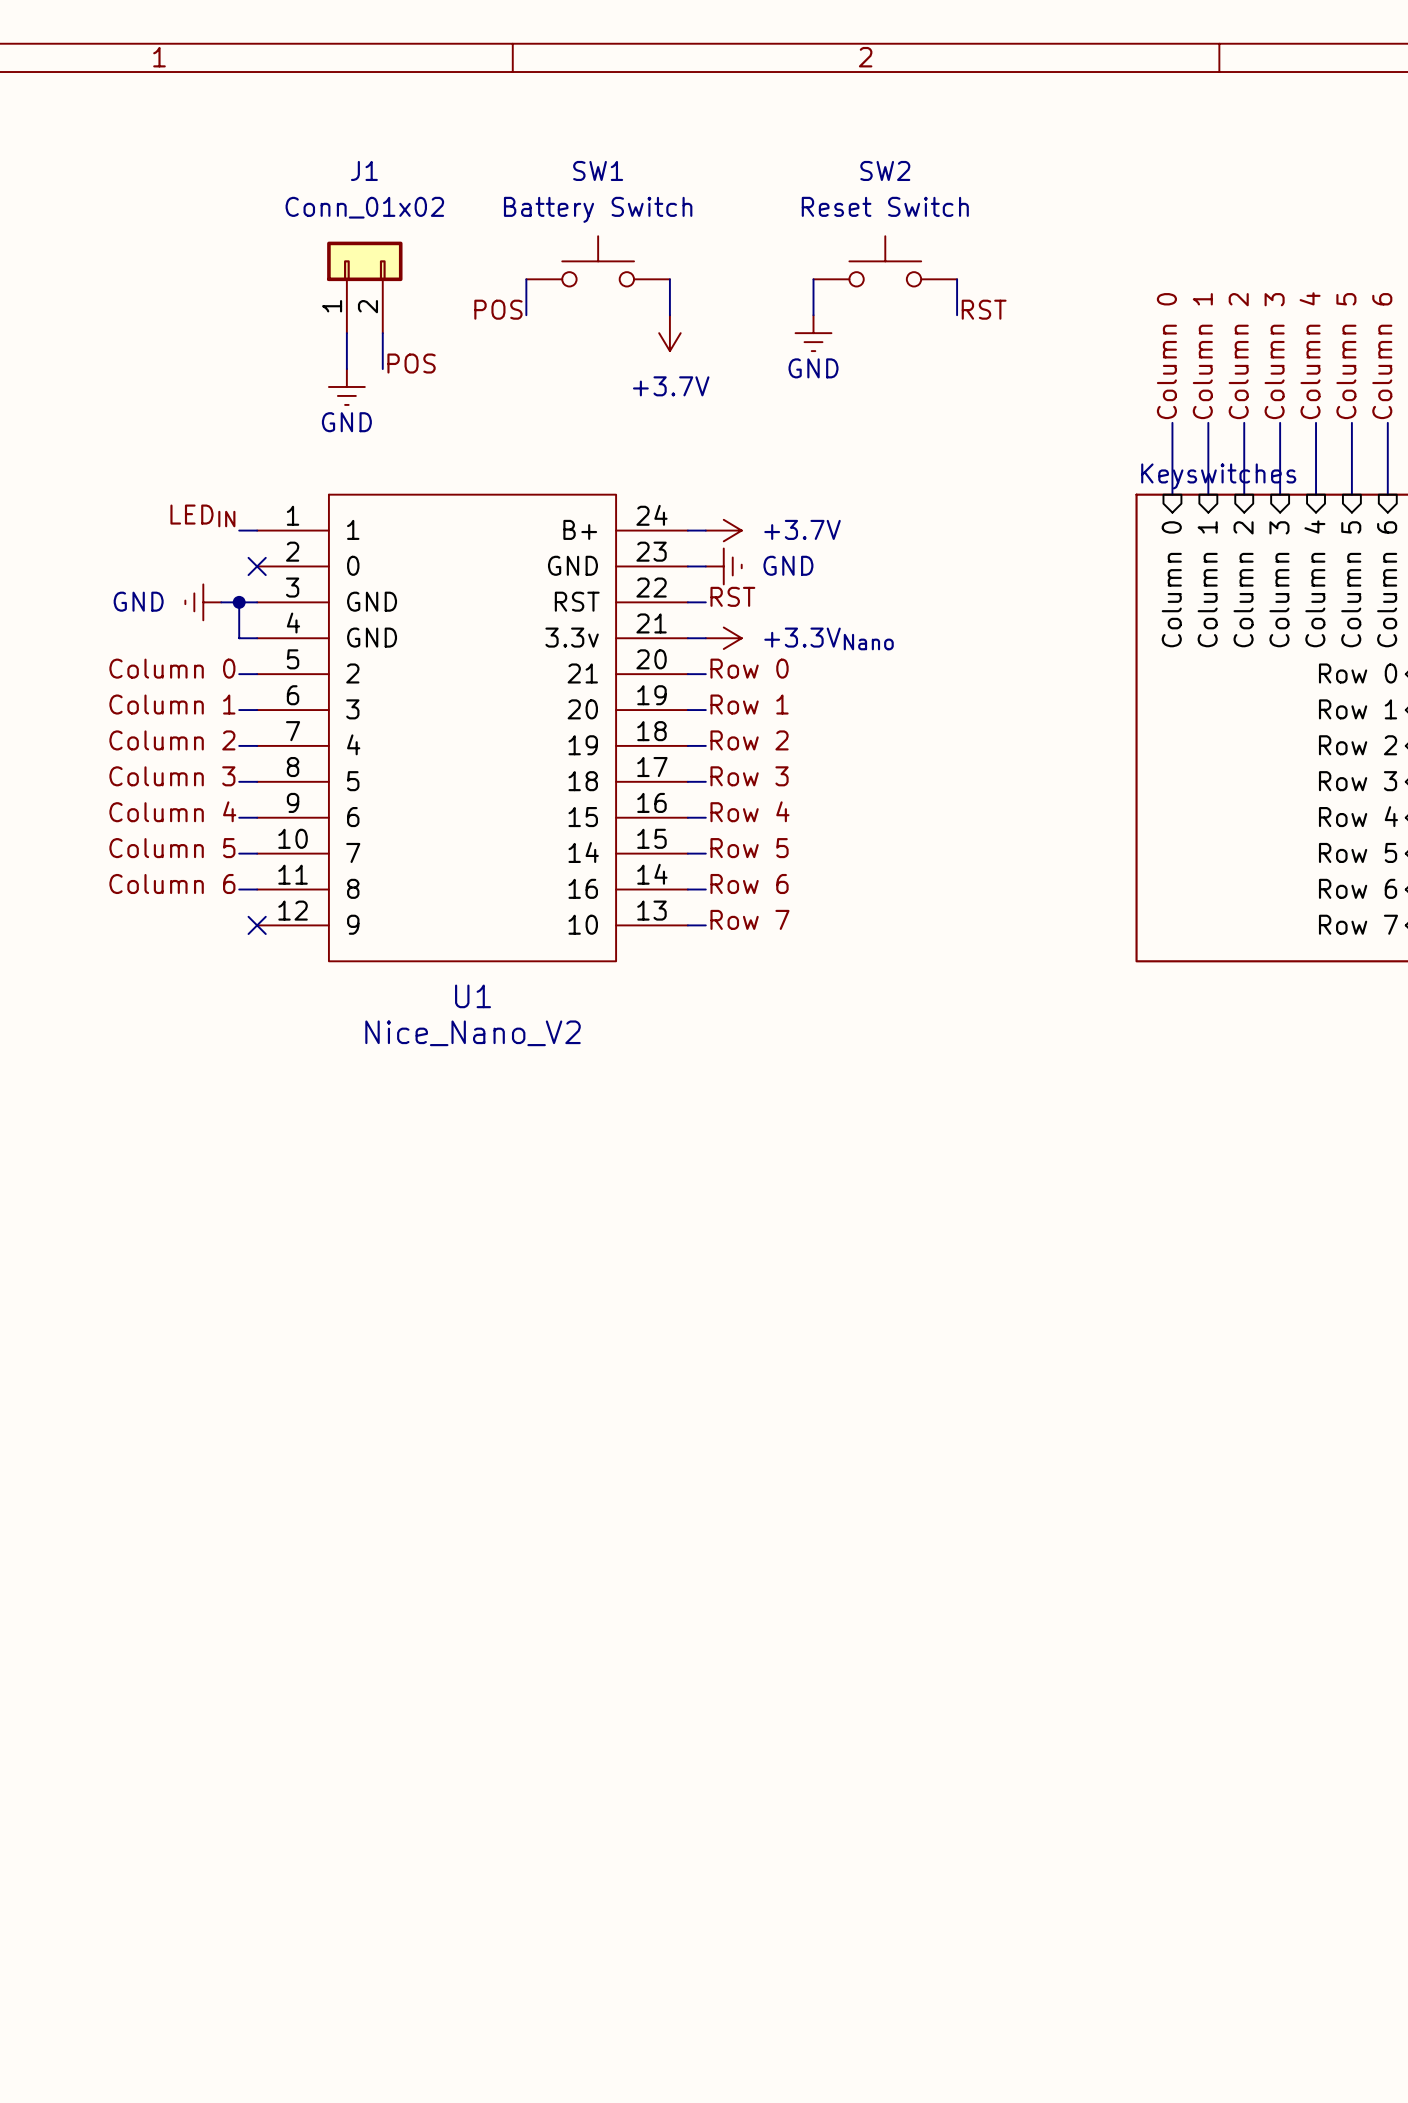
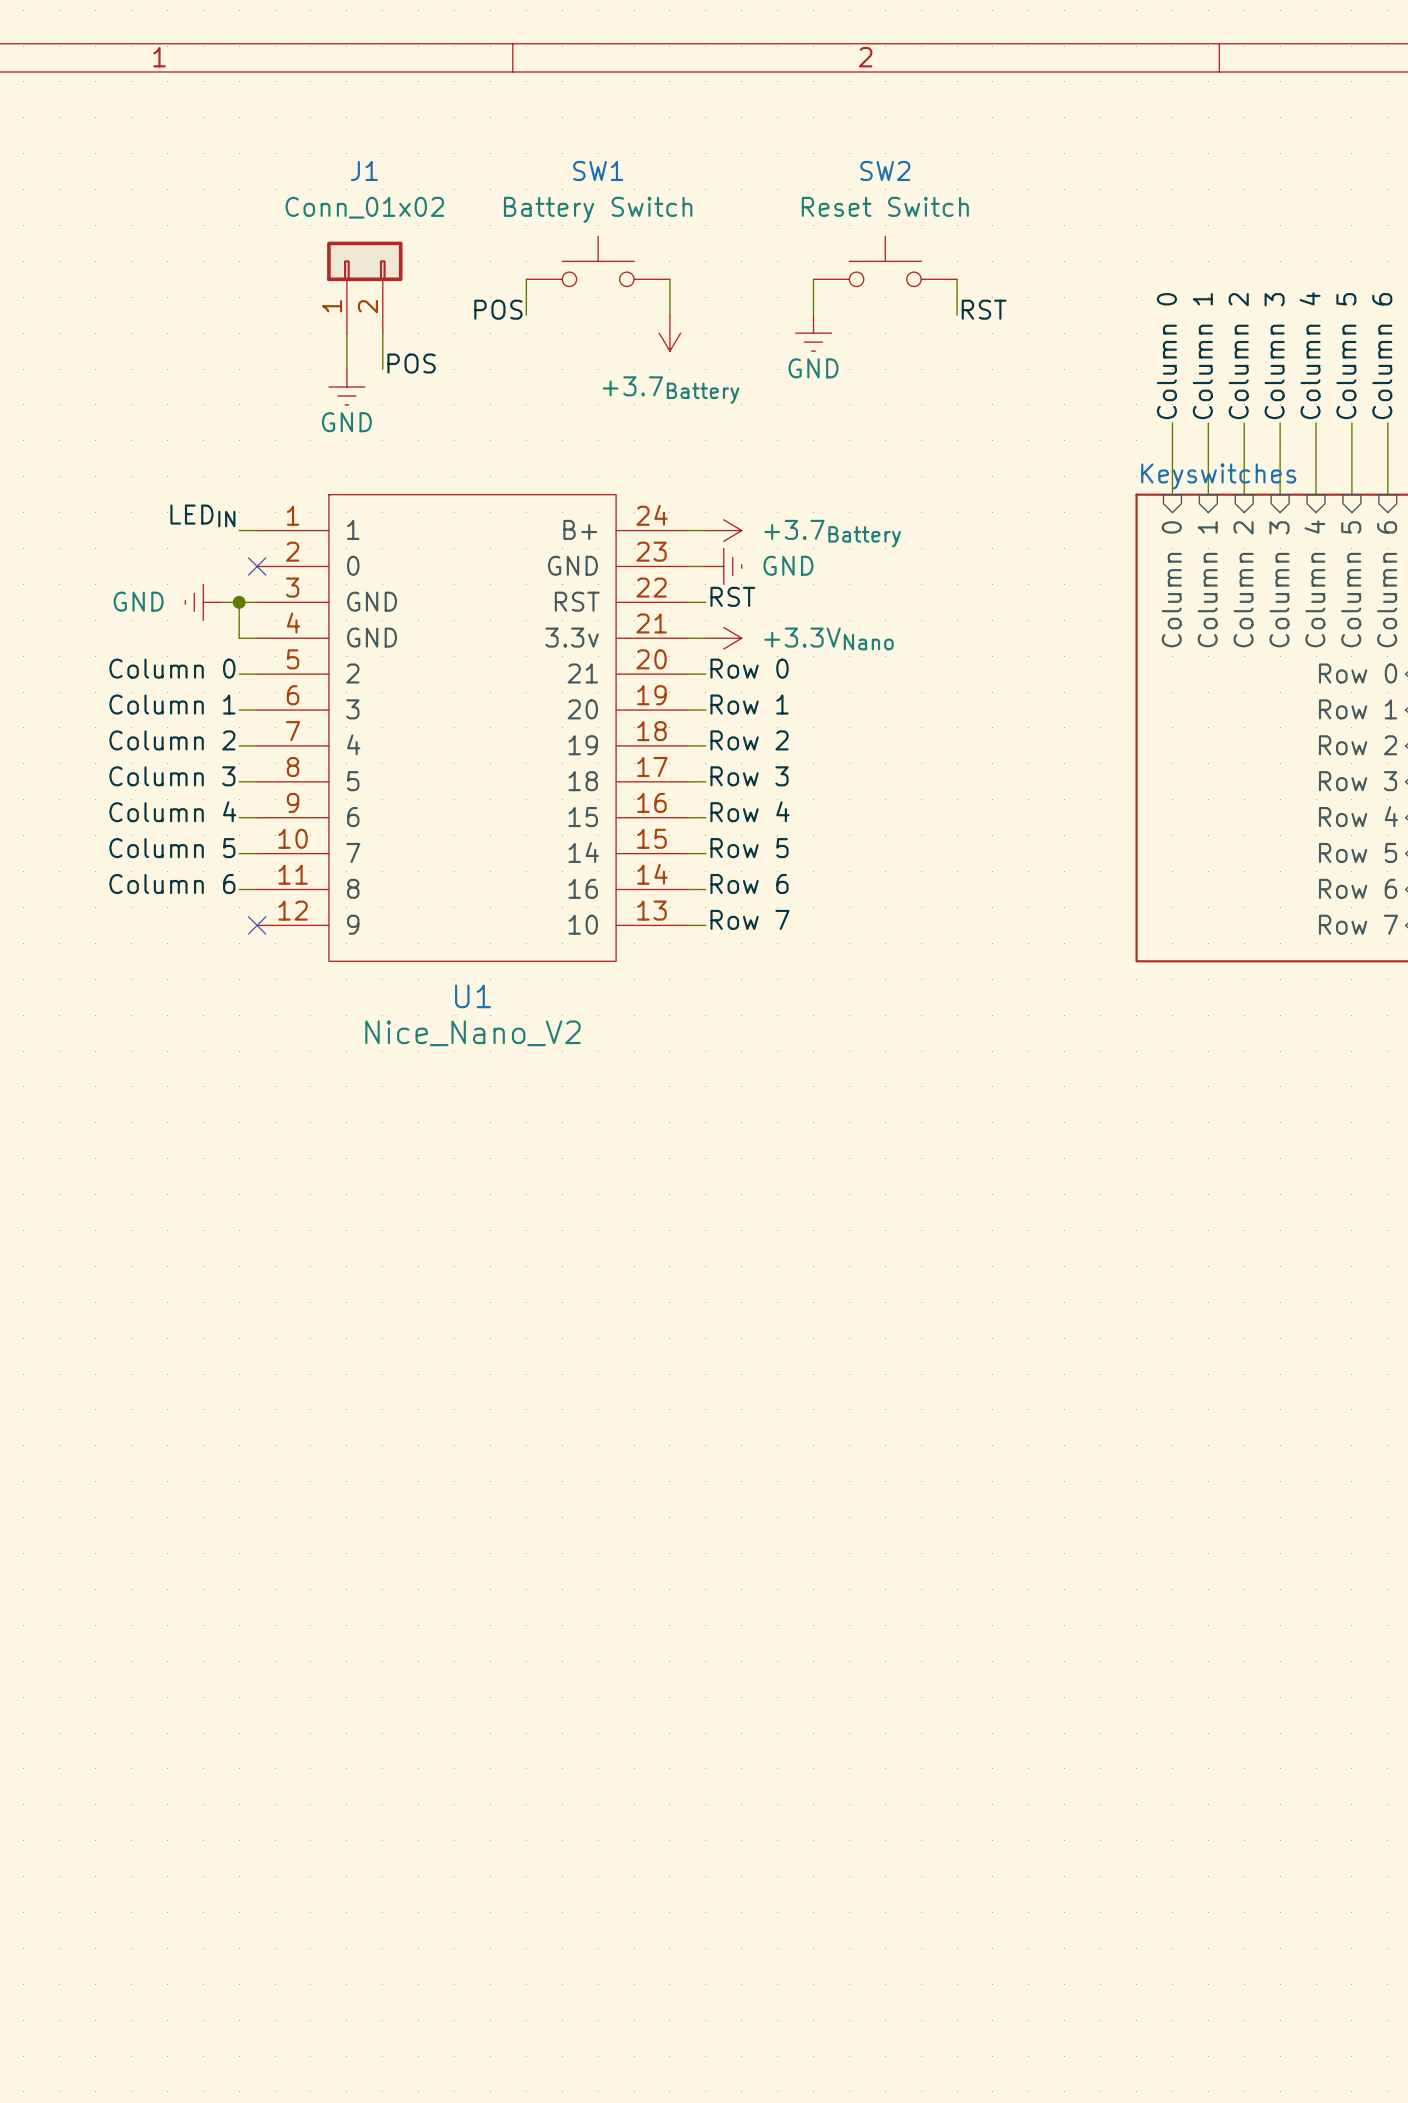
power symbol: +3.7V (669, 333) -> +3.7Battery (669, 333)
power symbol: +3.7V (723, 530) -> +3.7Battery (723, 530)

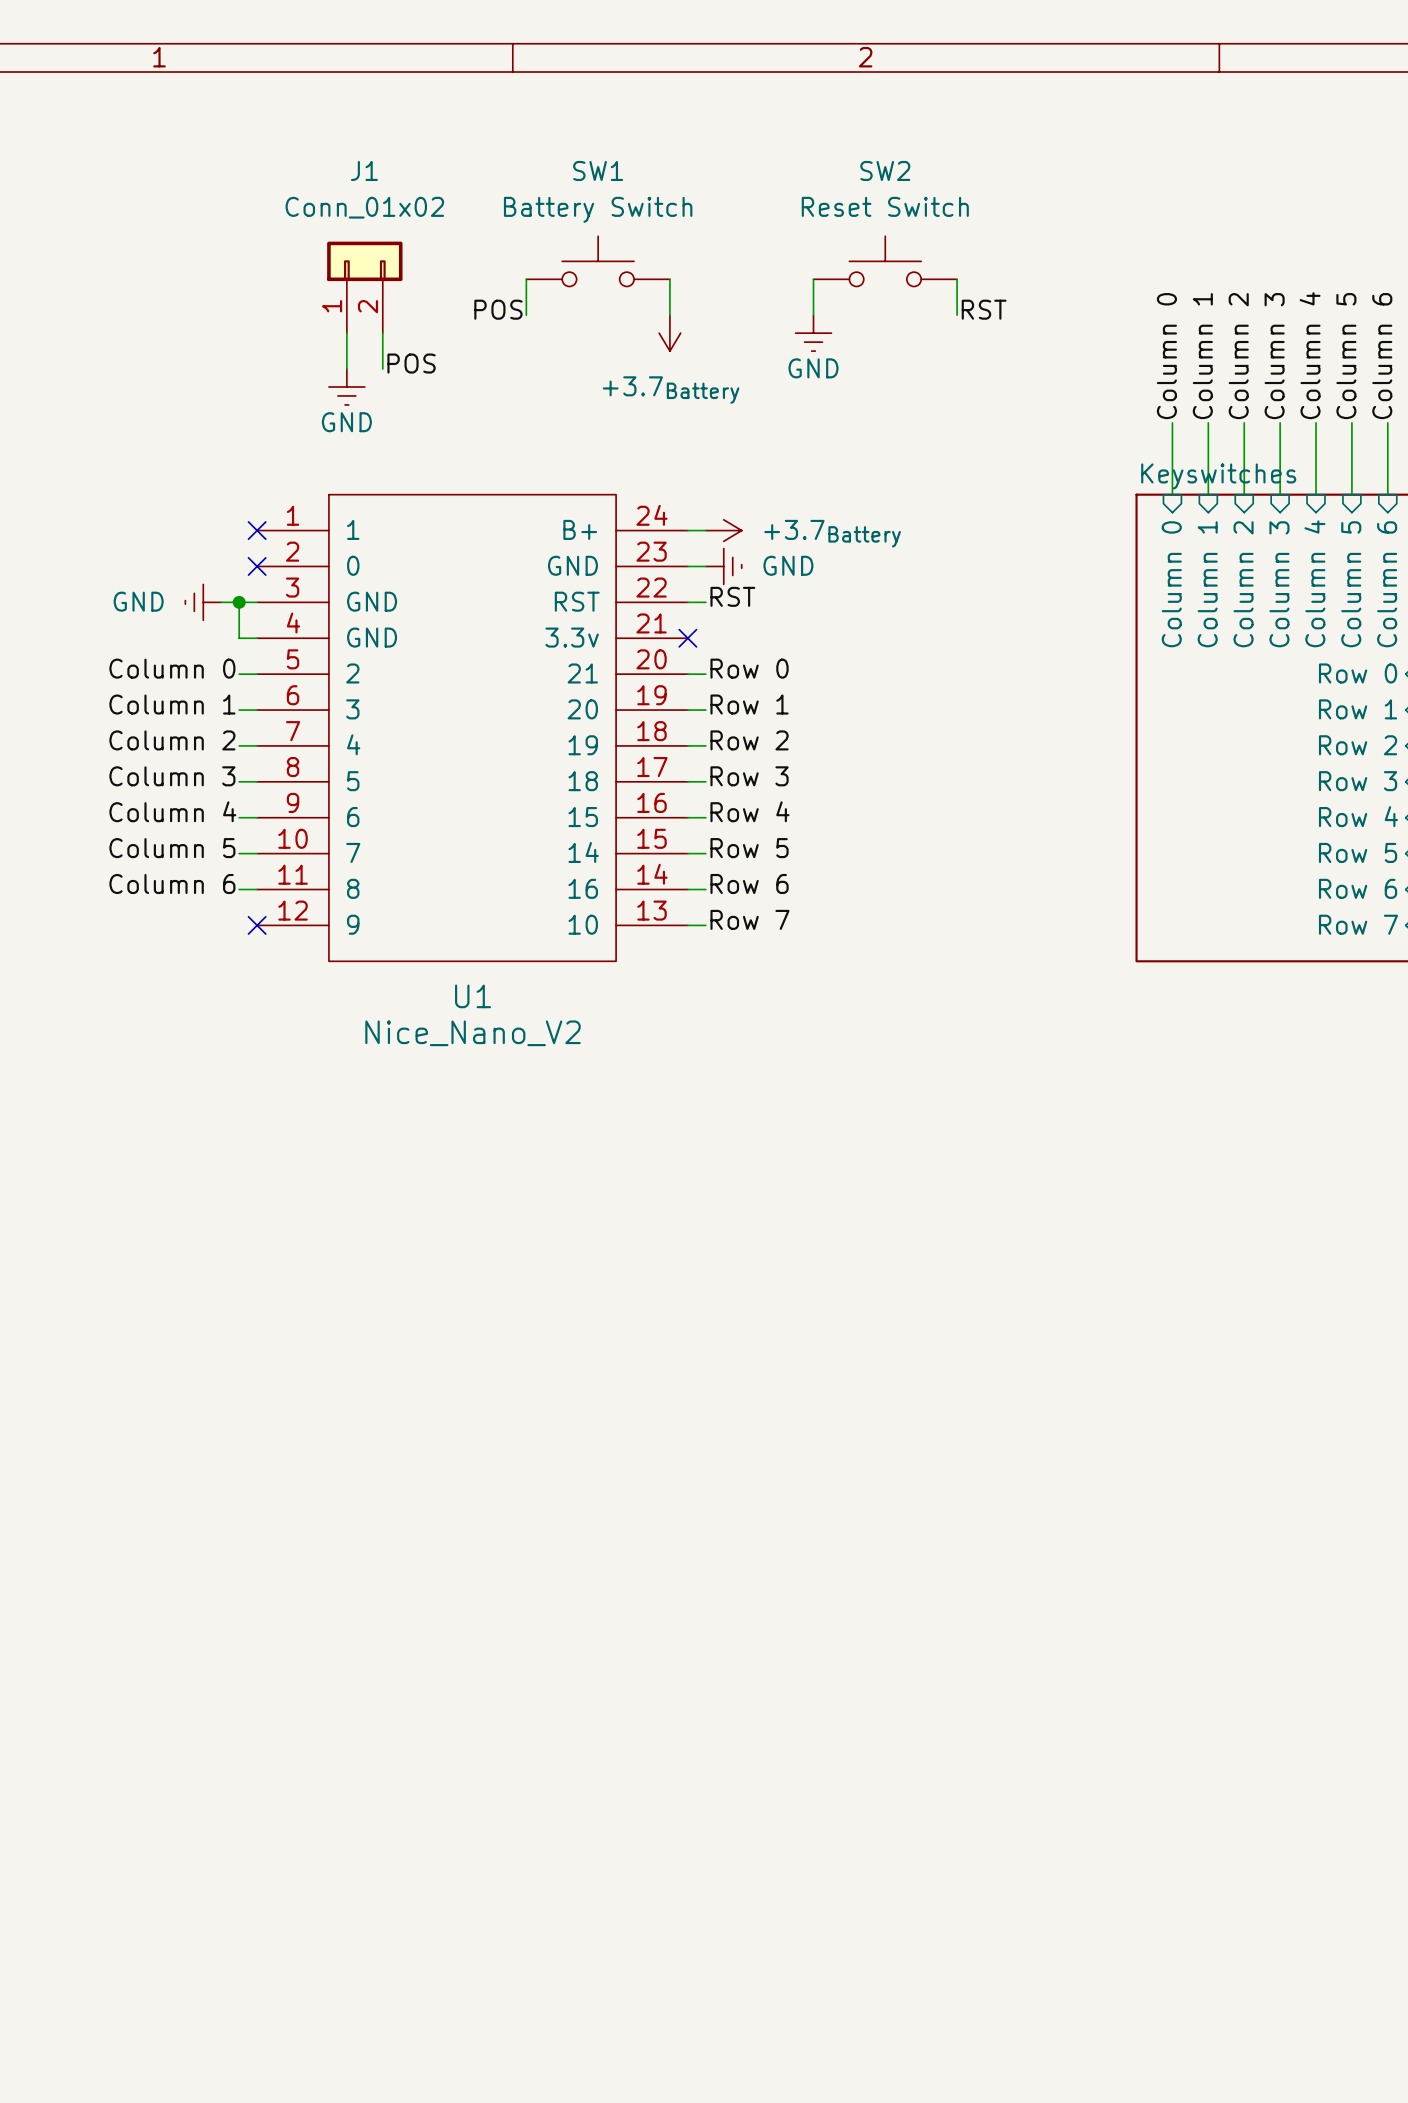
label: LEDIN (202, 515) -> none
wire: (239, 530) (257, 530) -> none
no-connect mark: none -> (257, 530)
wire: (687, 638) (705, 638) -> none
no-connect mark: none -> (687, 638)
power symbol: +3.3VNano (723, 638) -> none

